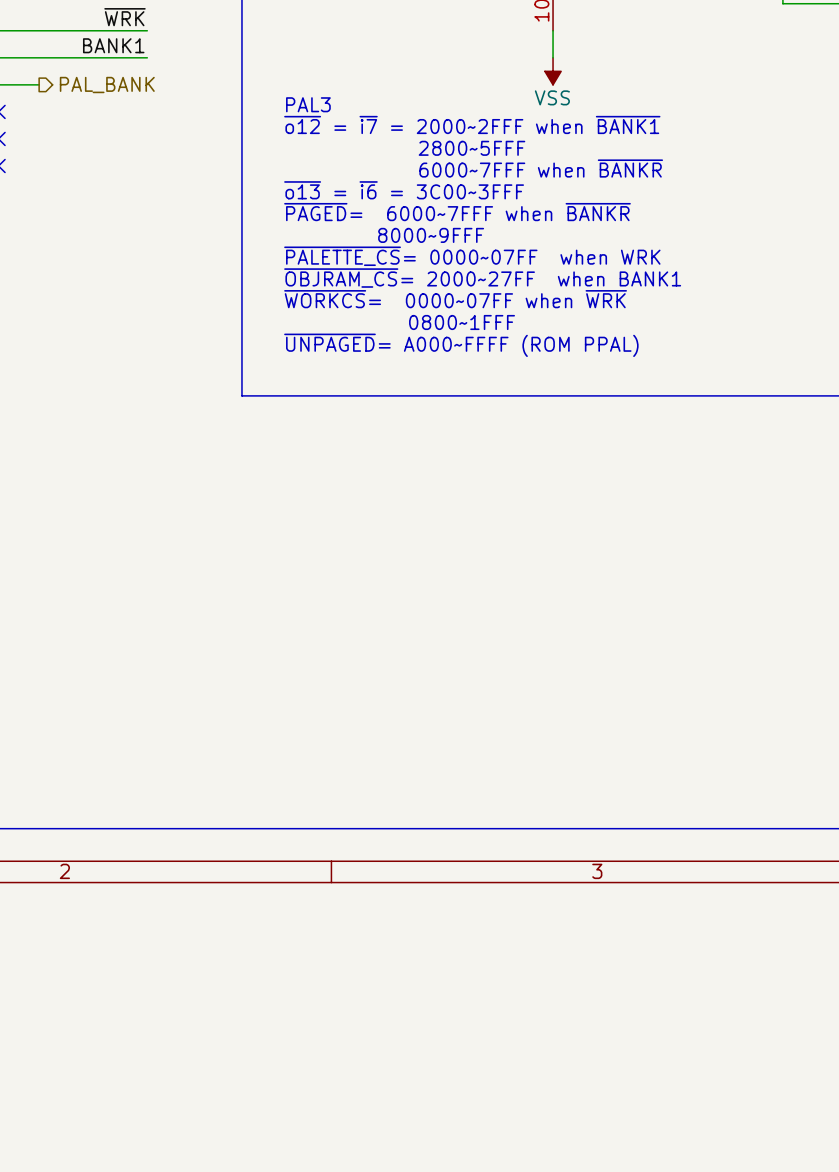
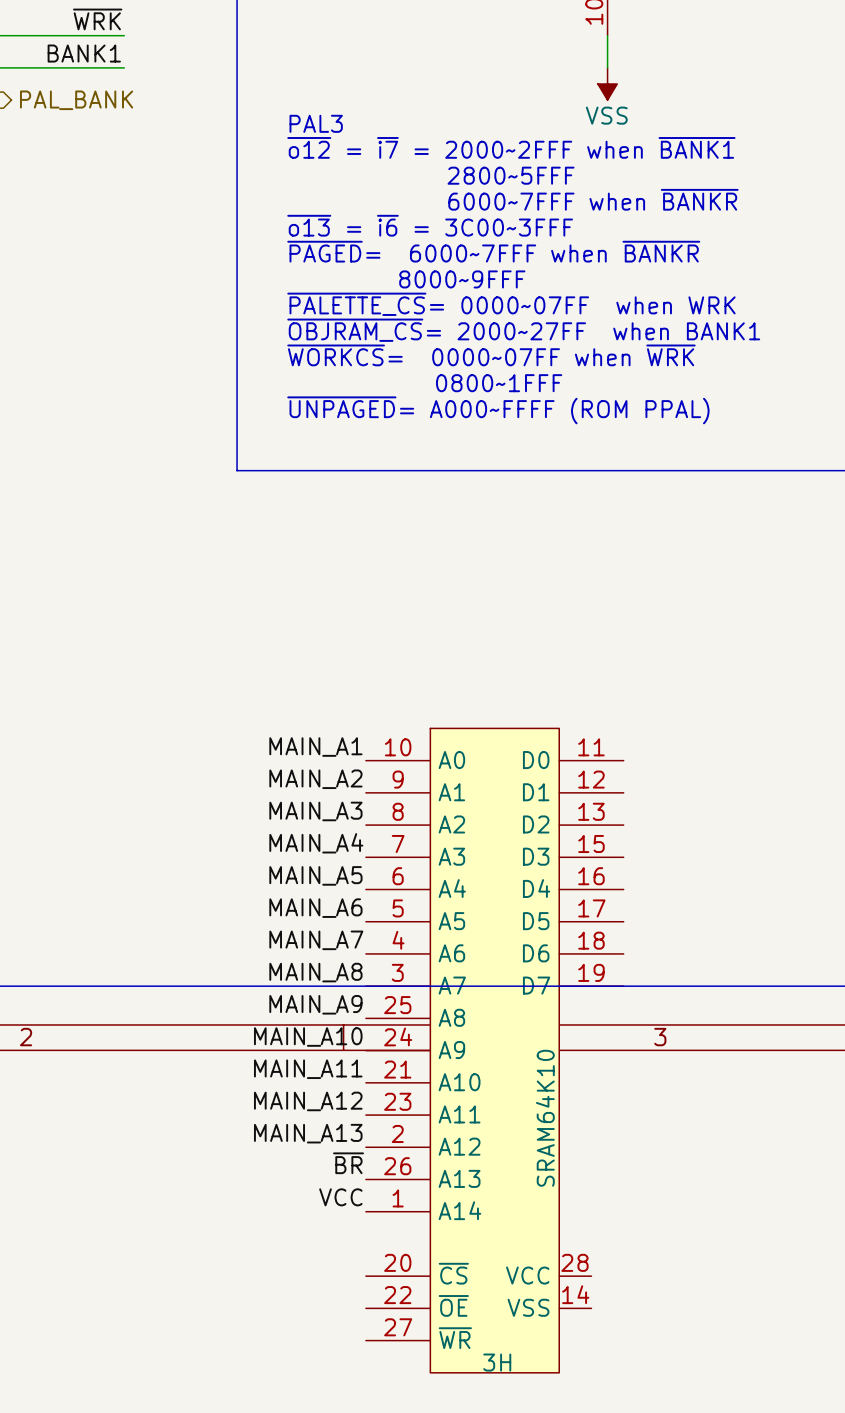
label: none -> MAIN_A1 (315, 747)
label: none -> MAIN_A2 (315, 779)
label: none -> MAIN_A3 (315, 811)
label: none -> MAIN_A4 (316, 843)
label: none -> MAIN_A5 (315, 875)
label: none -> MAIN_A6 (315, 908)
label: none -> MAIN_A7 (316, 940)
label: none -> MAIN_A8 (315, 972)
label: none -> MAIN_A9 (315, 1004)
label: none -> MAIN_A10 (308, 1037)
3H: none -> SRAM64K10 (494, 1050)
label: none -> MAIN_A11 (308, 1069)
label: none -> MAIN_A12 (308, 1101)
label: none -> MAIN_A13 (308, 1133)
label: none -> ~{BR} (348, 1163)
label: none -> VCC (340, 1197)

